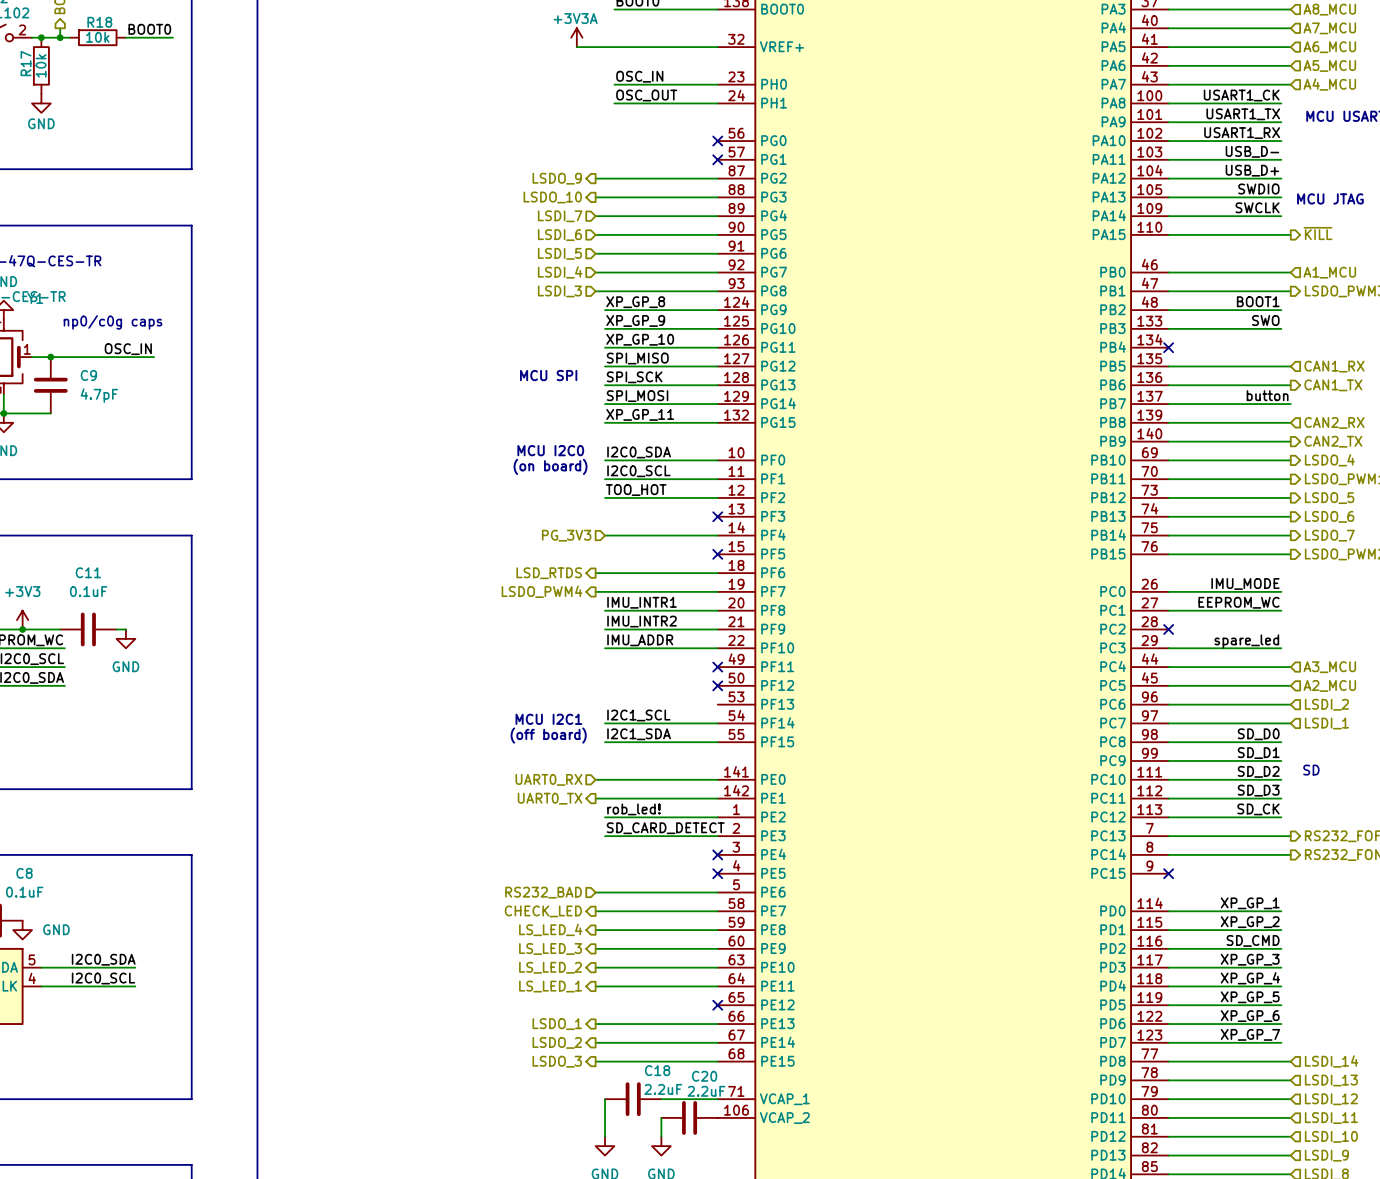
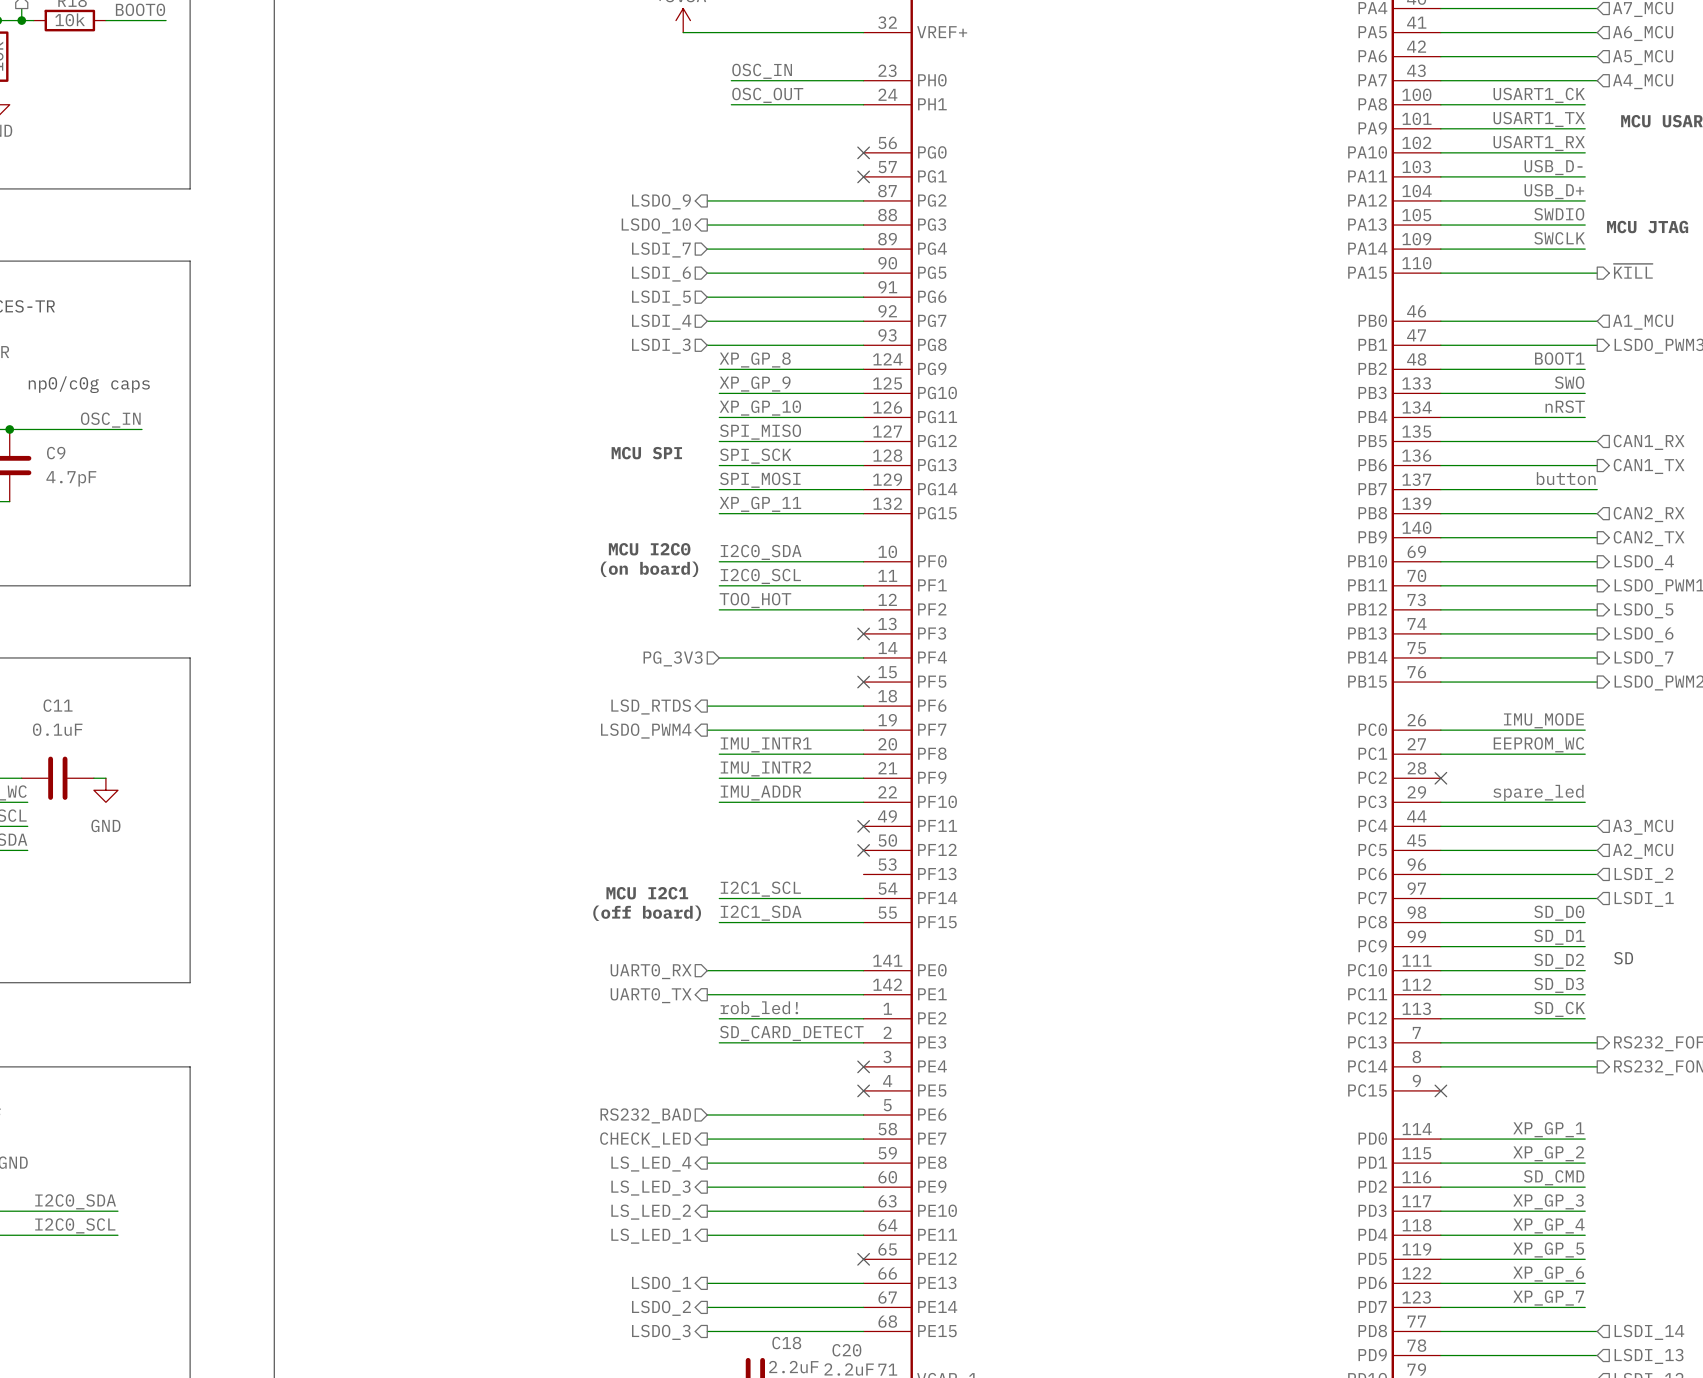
label: none -> nRST (1565, 406)
wire: none -> (1440, 417) (1585, 417)
no-connect mark: (1168, 347) -> none

